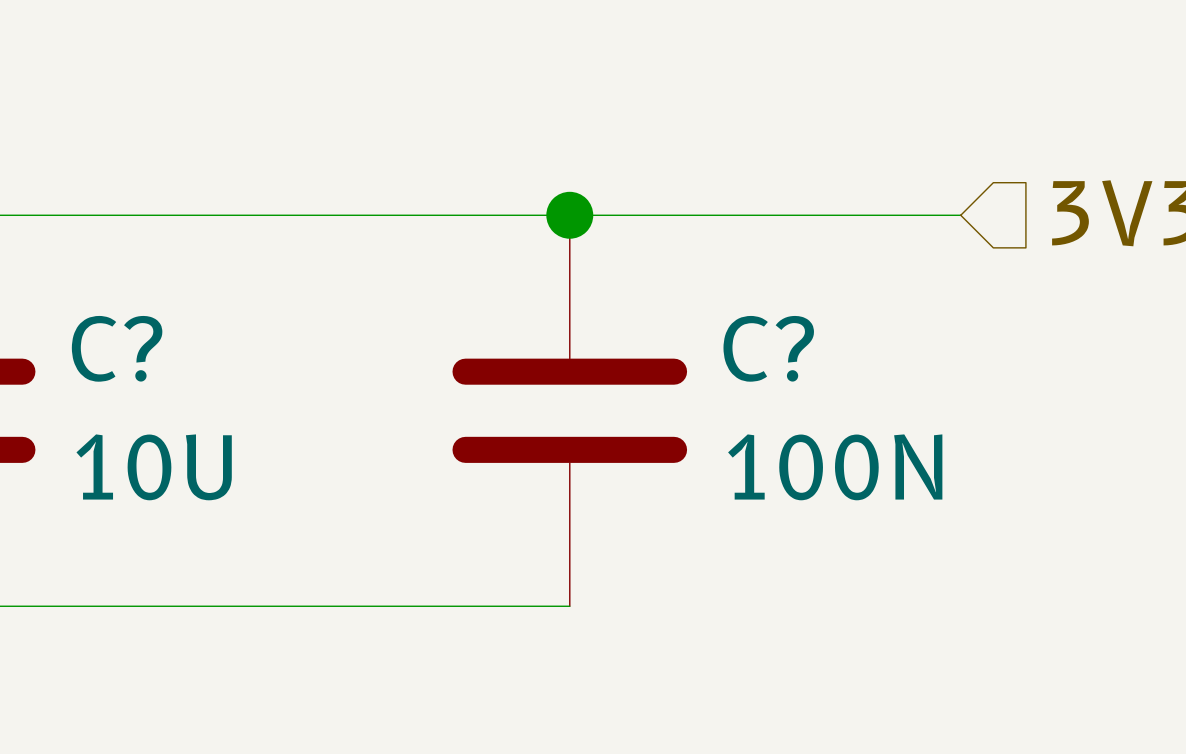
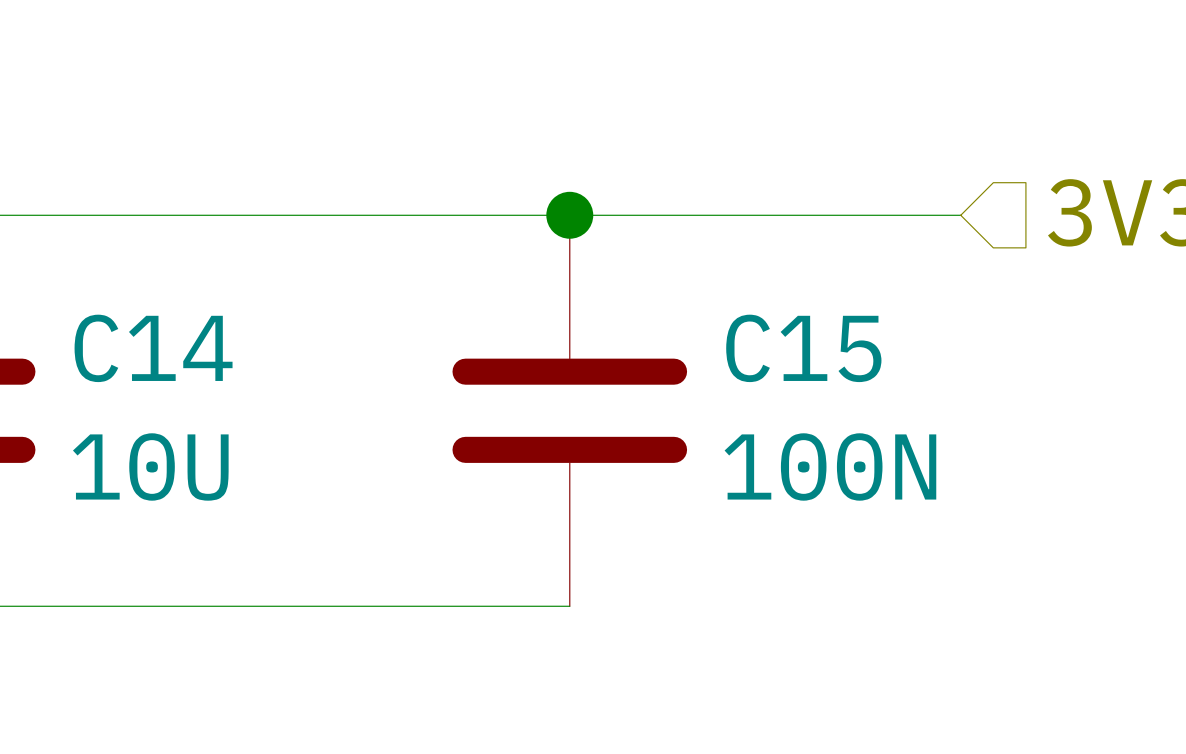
C? name: C? (117, 348) -> C14 (153, 348)
C? name: C? (768, 348) -> C15 (803, 348)

